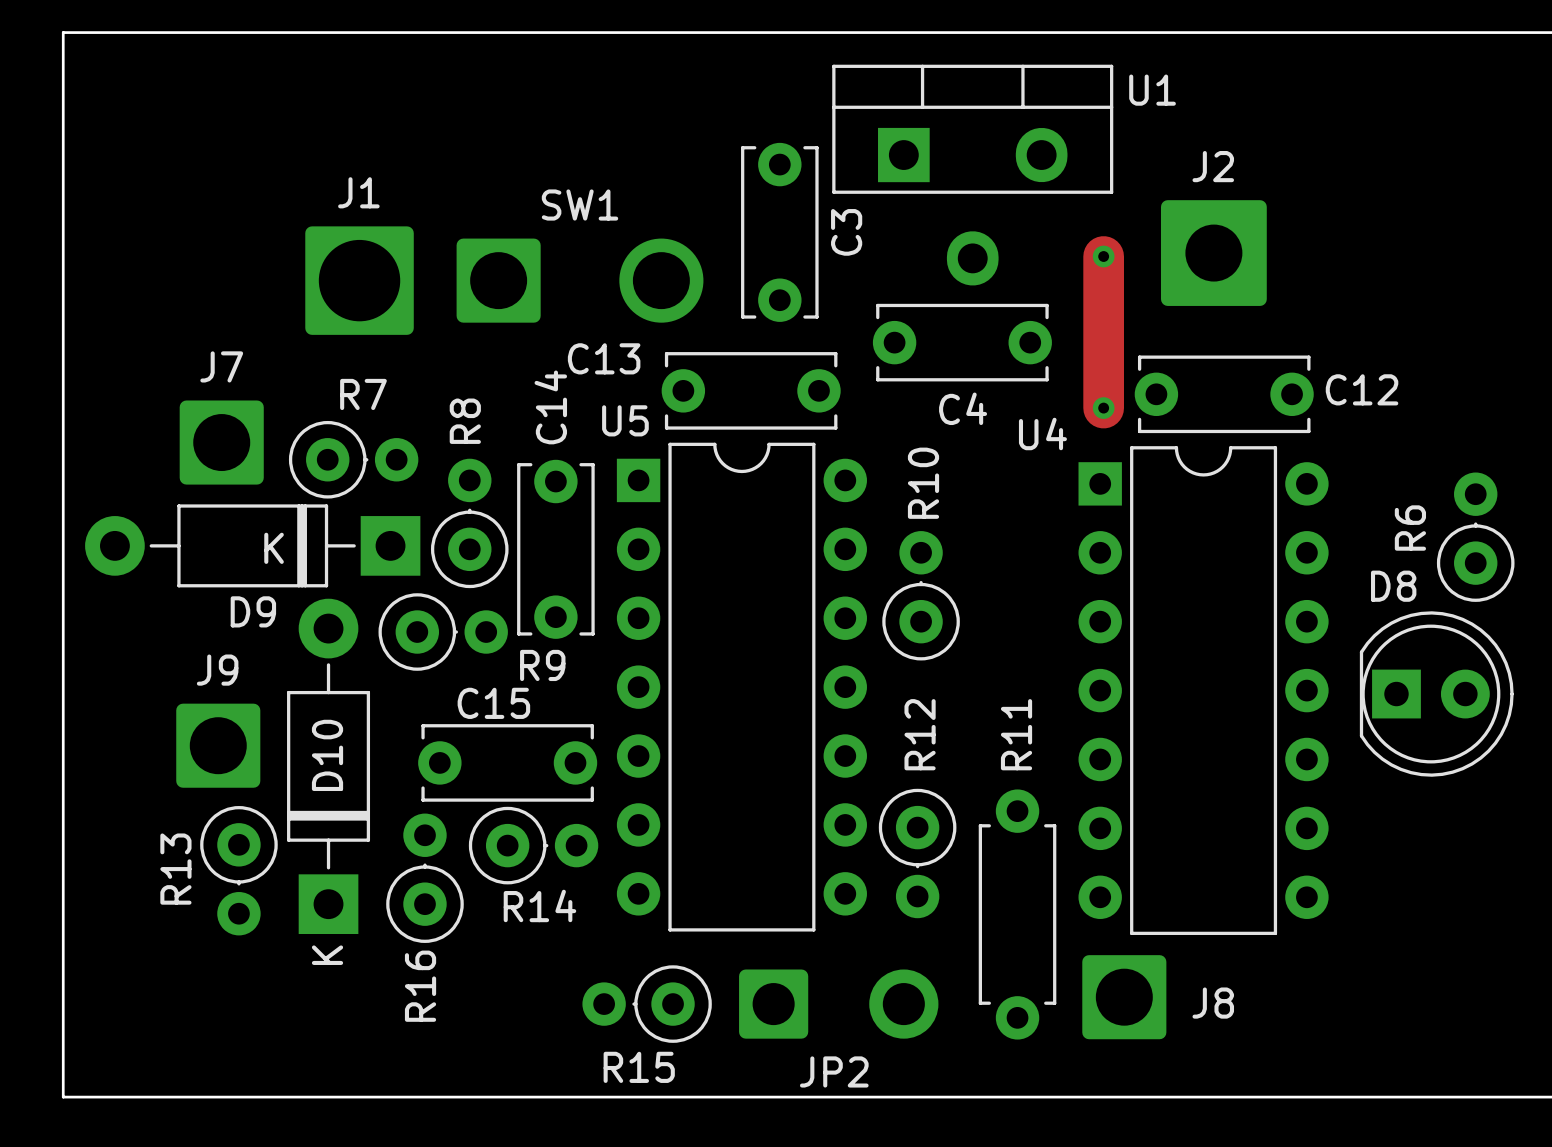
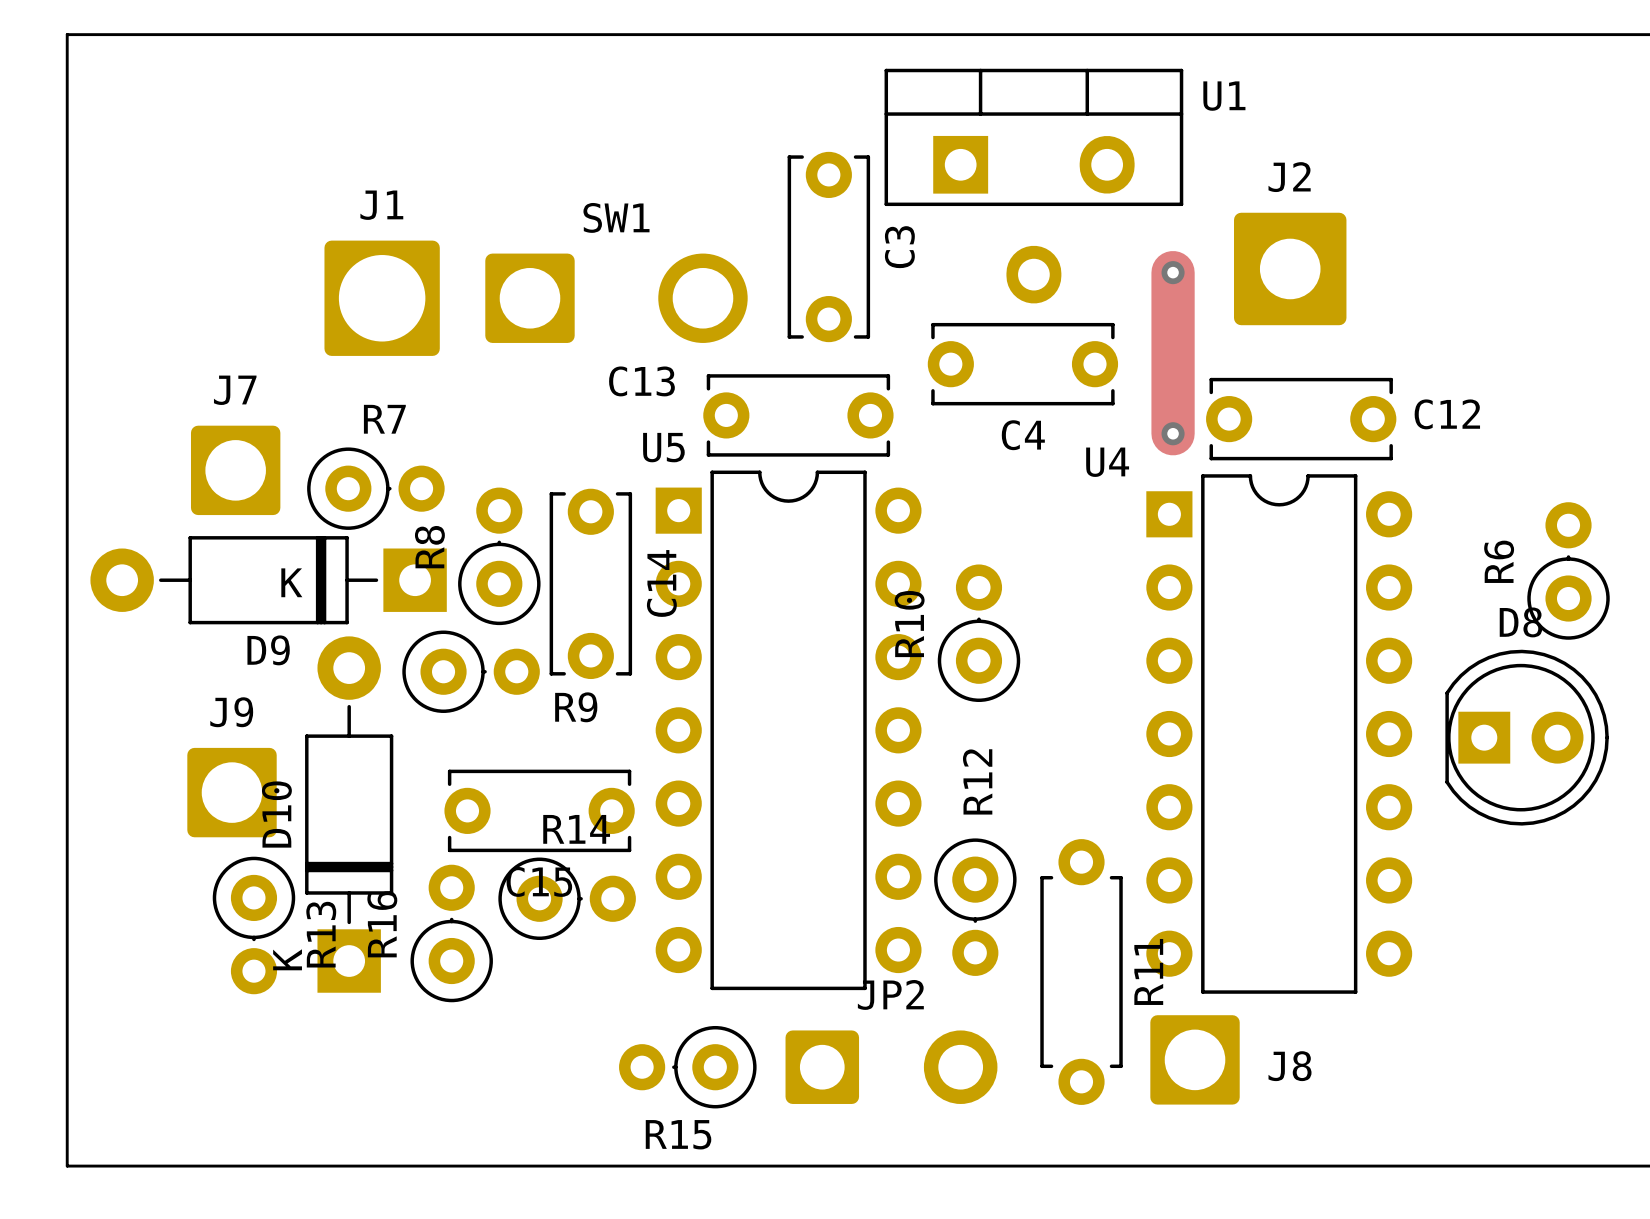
C14 name position: C14 (550, 407) -> C14 (661, 583)
R8 name position: R8 (465, 421) -> R8 (429, 547)
R10 name position: R10 (923, 483) -> R10 (909, 624)
D8 name position: D8 (1393, 586) -> D8 (1520, 622)
C15 name position: C15 (493, 703) -> C15 (539, 881)
R11 name position: R11 (1016, 734) -> R11 (1148, 971)
D10 name position: D10 (327, 755) -> D10 (276, 814)
R13 name position: R13 (175, 869) -> R13 (321, 934)
R14 name position: R14 (539, 905) -> R14 (576, 829)
D10 text position: K (327, 955) -> K (287, 959)
R16 name position: R16 (420, 986) -> R16 (382, 924)
JP2 name position: JP2 (834, 1071) -> JP2 (890, 994)

